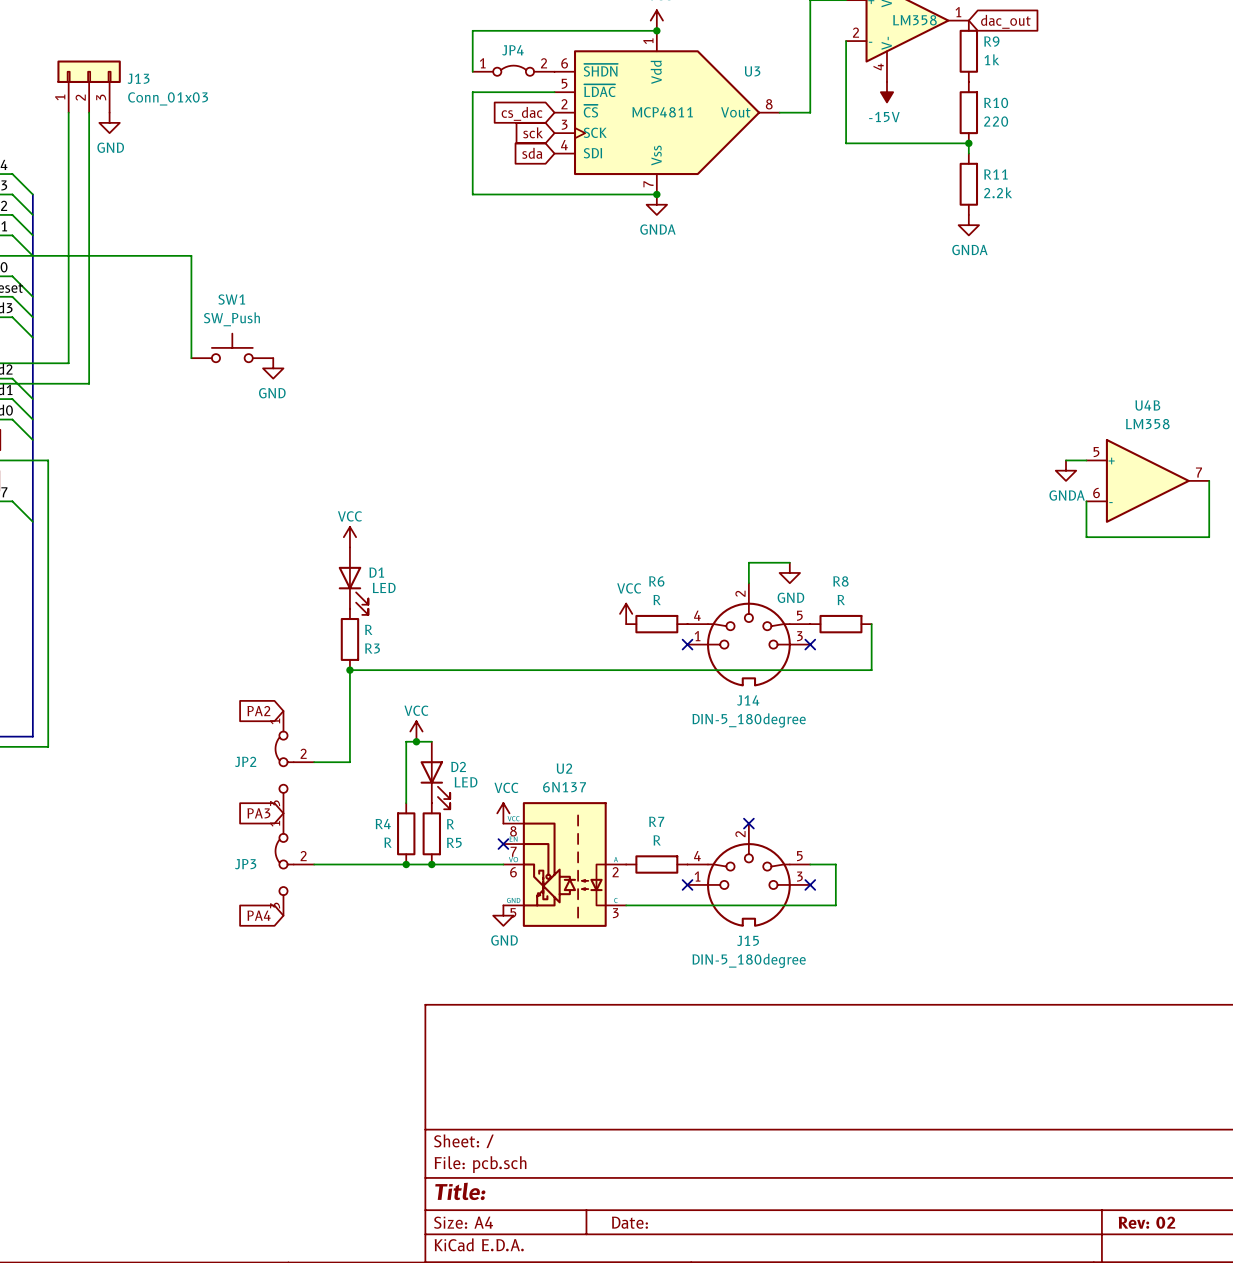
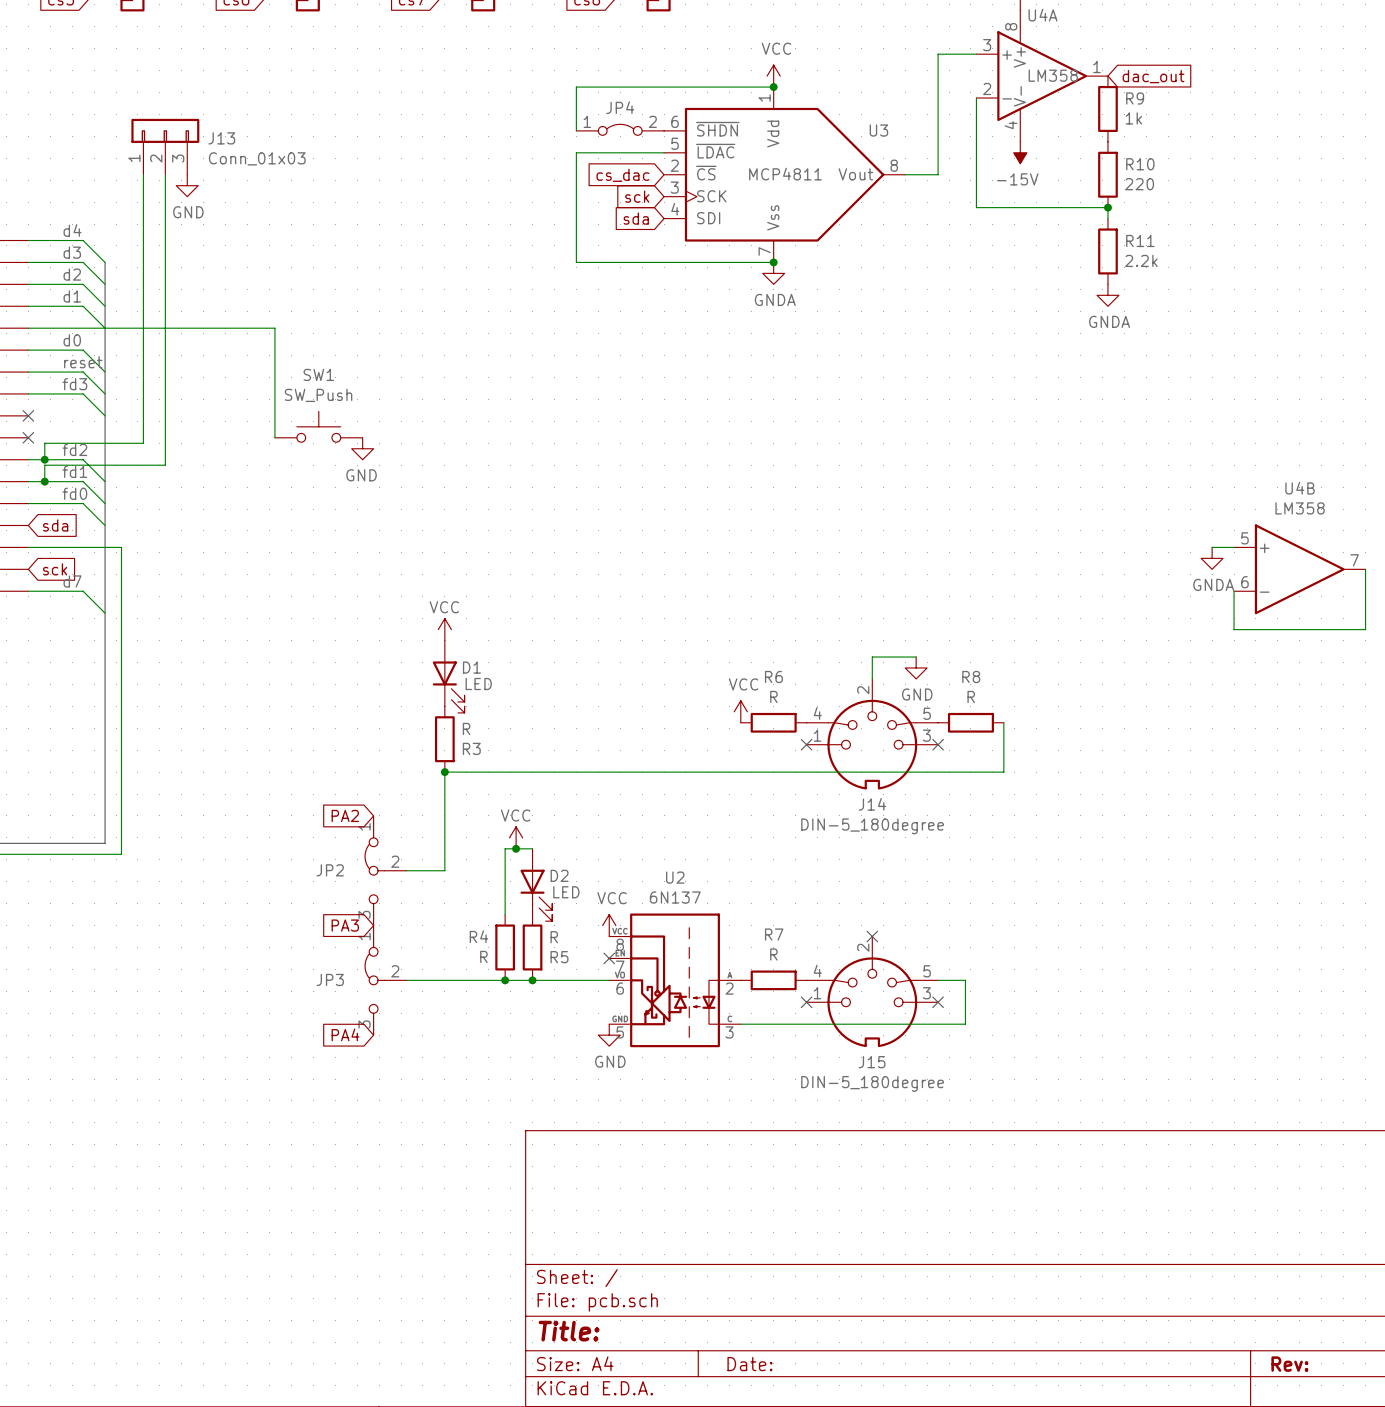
title block: Rev: 02 (1146, 1222) -> Rev: (1289, 1364)

